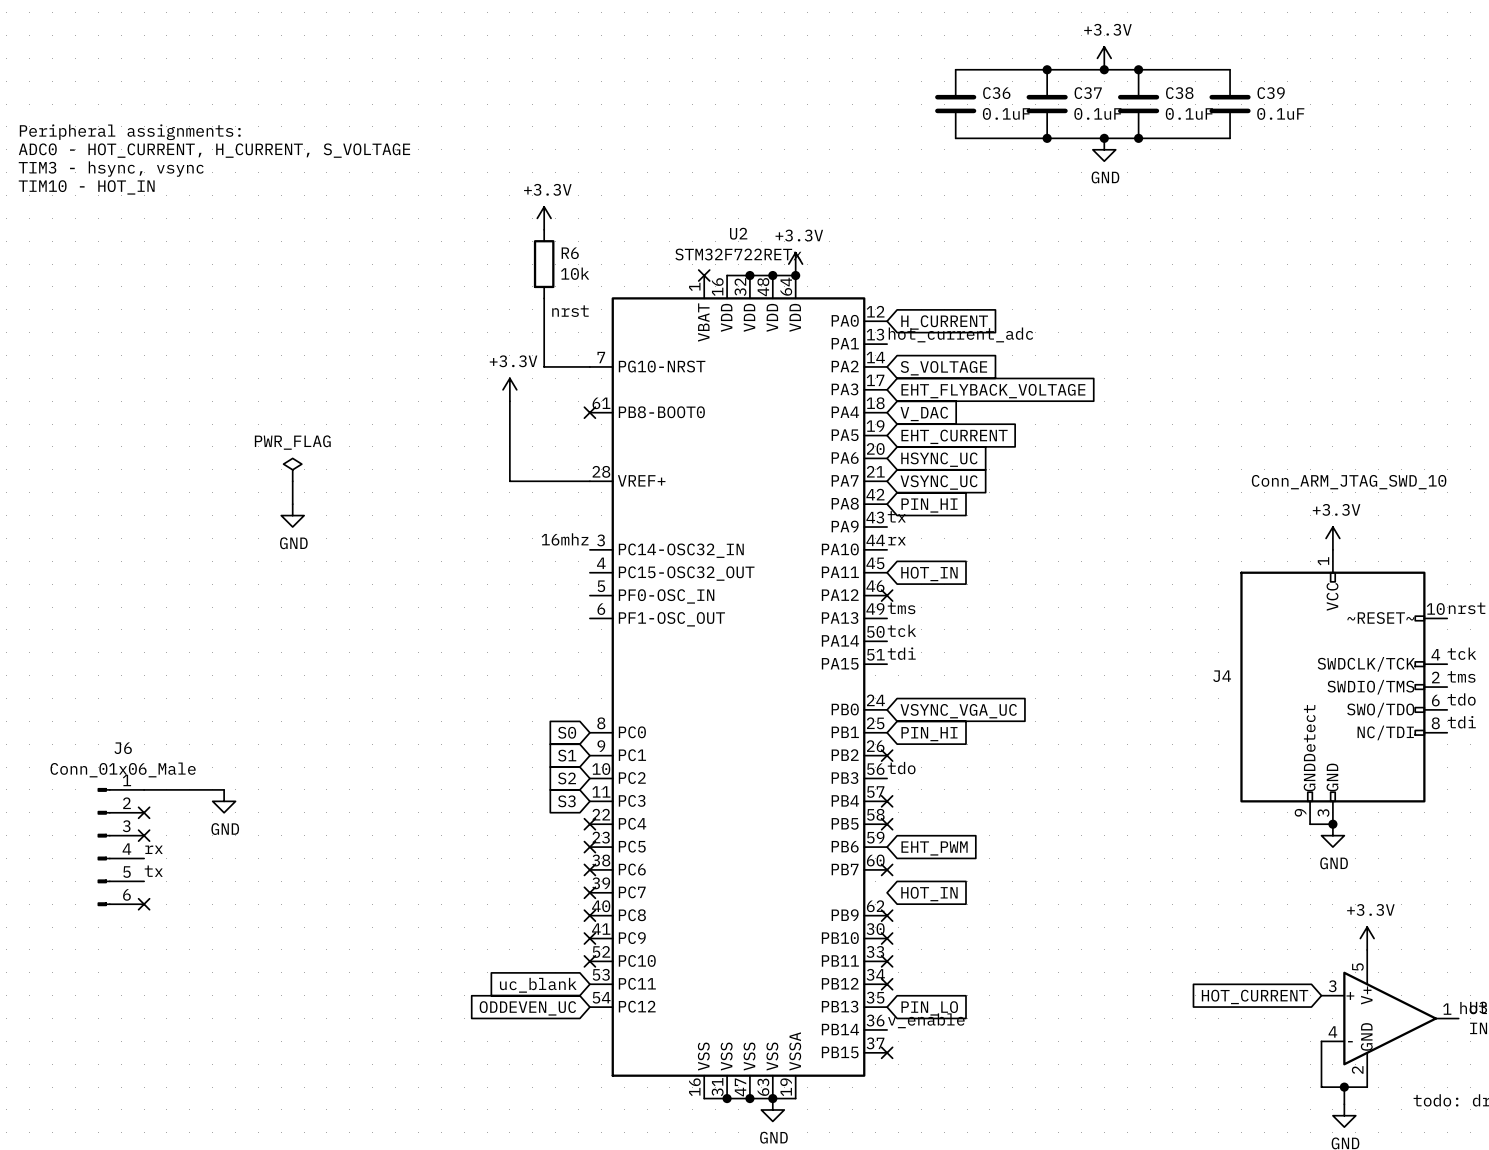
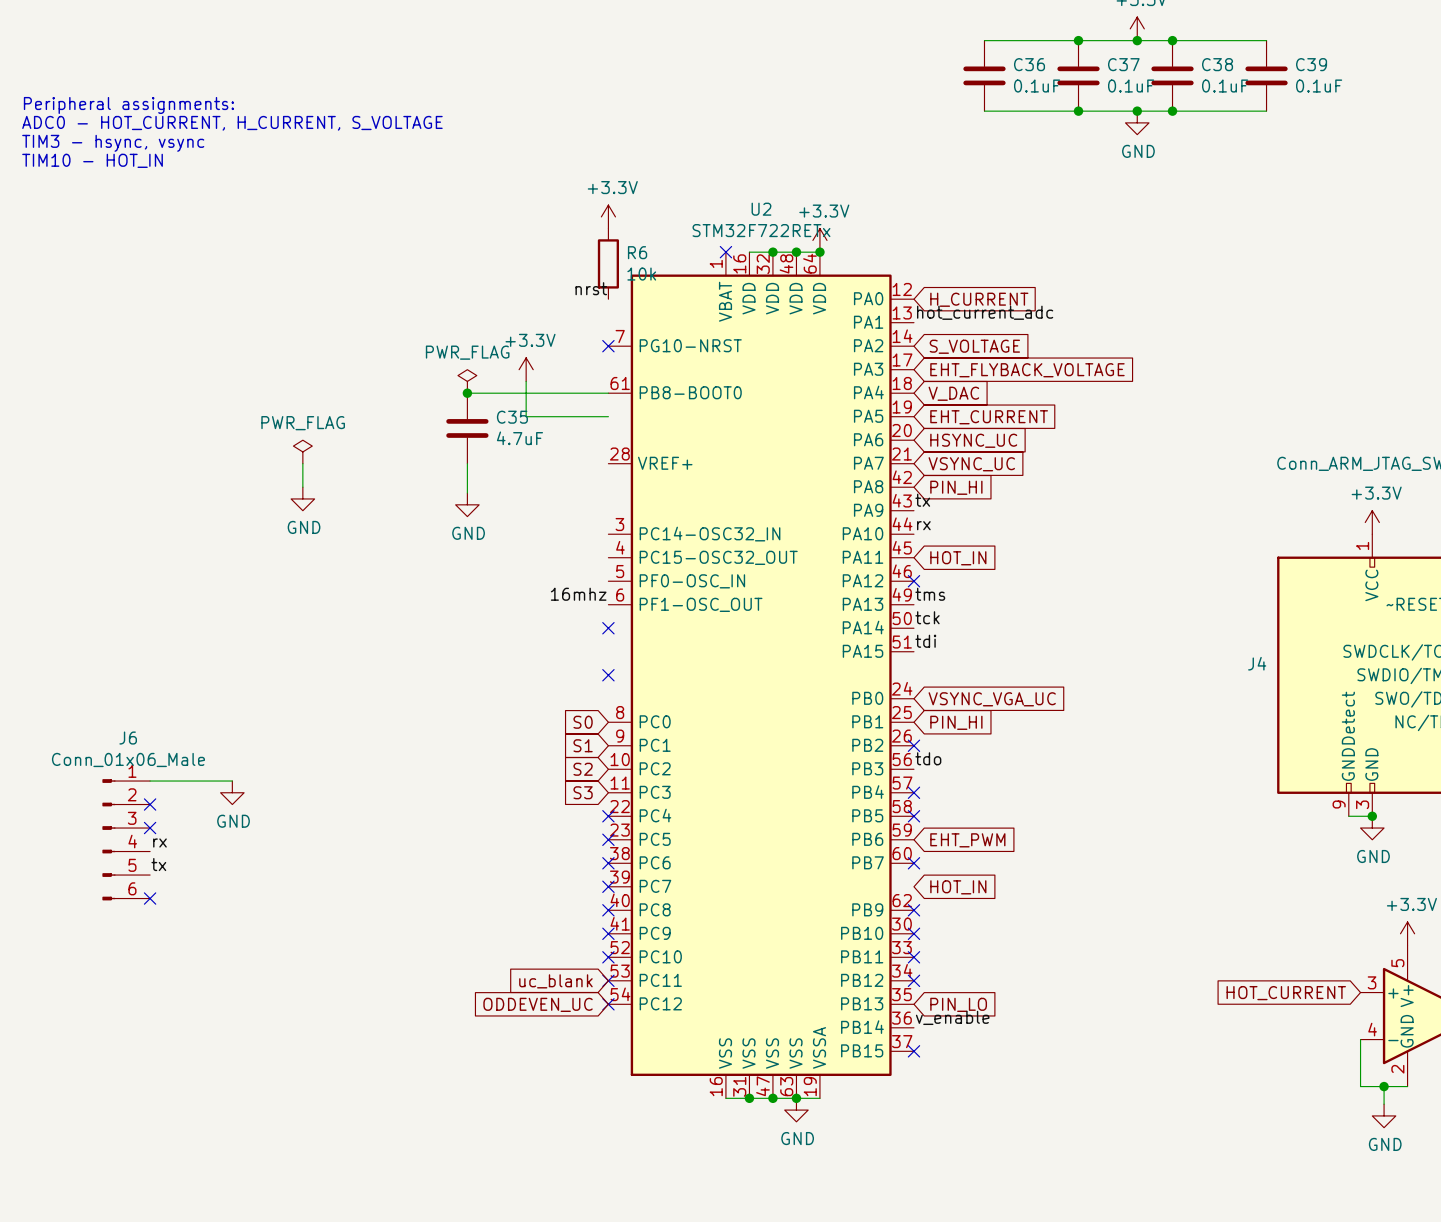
power symbol position: +3.3V (544, 218) -> +3.3V (608, 216)
R6 position: (544, 264) -> (608, 263)
wire: (544, 298) (544, 366) (589, 366) -> none
power symbol: none -> PWR_FLAG (467, 381)
wire: none -> (467, 393) (608, 393)
junction: none -> (467, 393)
no-connect mark position: (589, 412) -> (608, 346)
wire: (509, 435) (509, 481) (589, 481) -> (526, 416) (608, 416)
C35: none -> 4.7uF (467, 428)
wire: none -> (467, 463) (467, 493)
power symbol: none -> GND (467, 504)
label position: 16mhz (565, 539) -> 16mhz (578, 594)
no-connect mark: none -> (608, 628)
no-connect mark: none -> (608, 675)
no-connect mark: none -> (608, 980)
no-connect mark: none -> (608, 1004)

